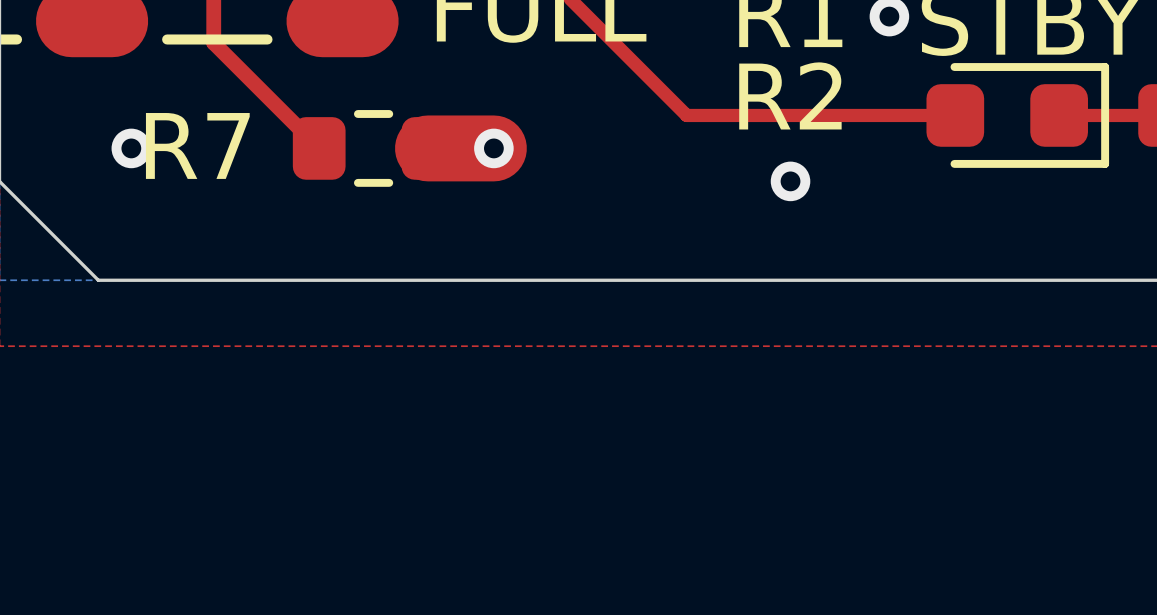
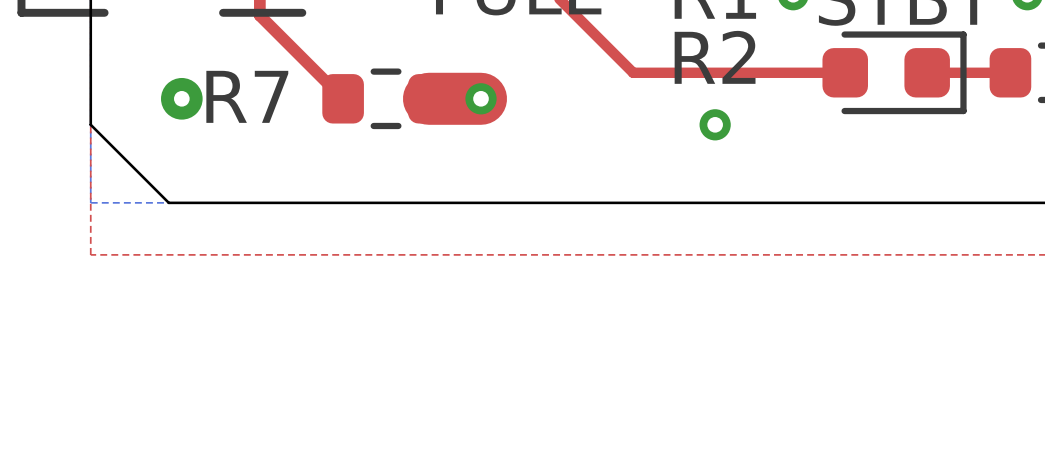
via size: [111, 128, 152, 169] -> [161, 77, 203, 120]

